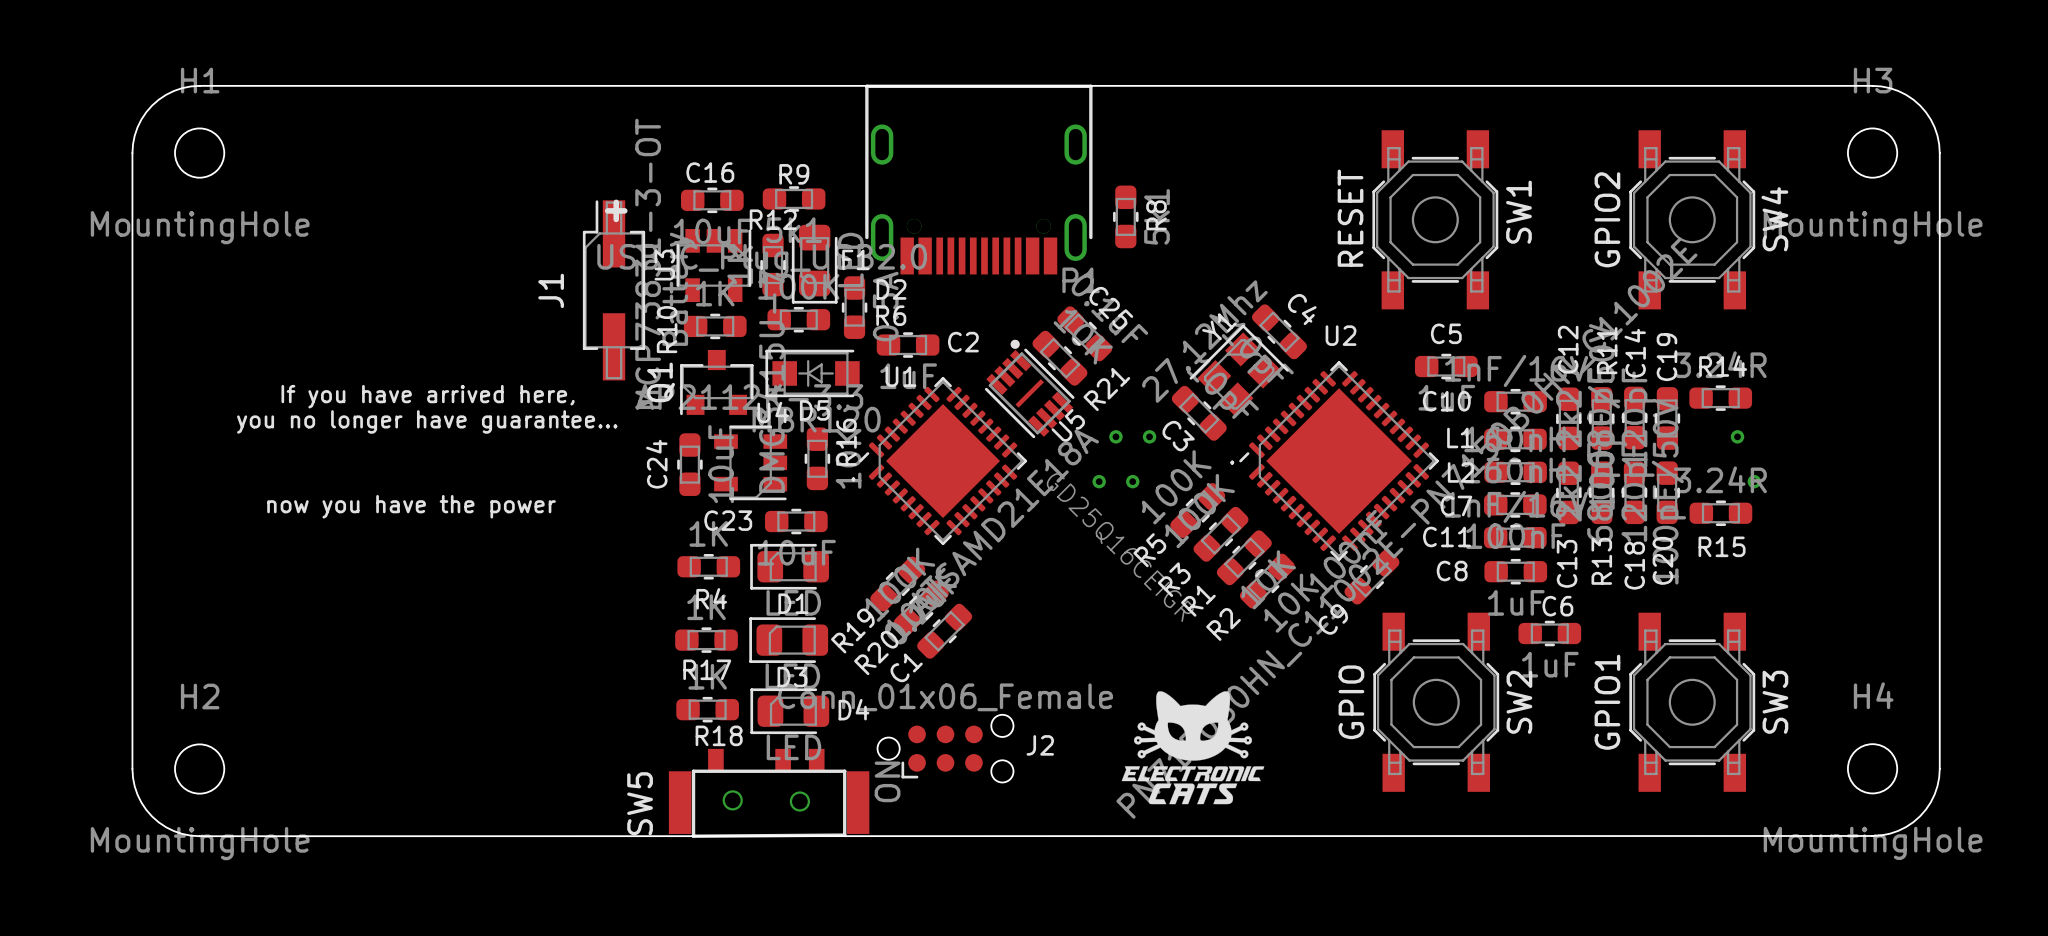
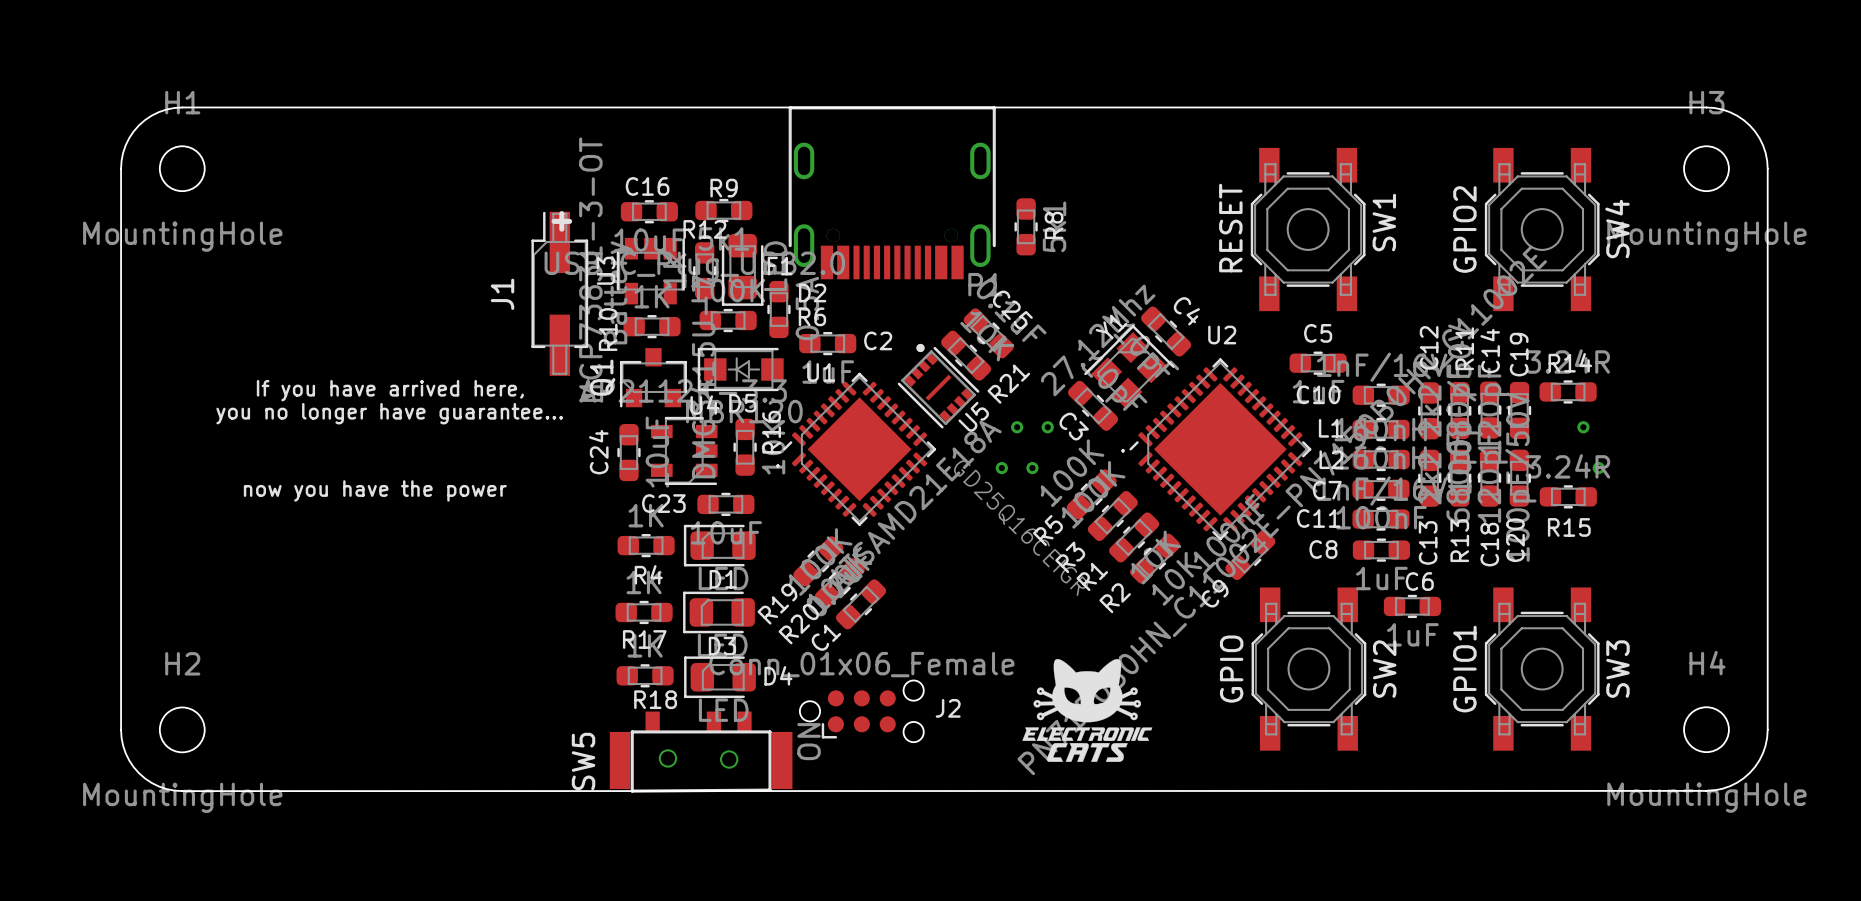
U5 footprint: [984, 339, 1075, 439] -> [897, 343, 980, 429]

